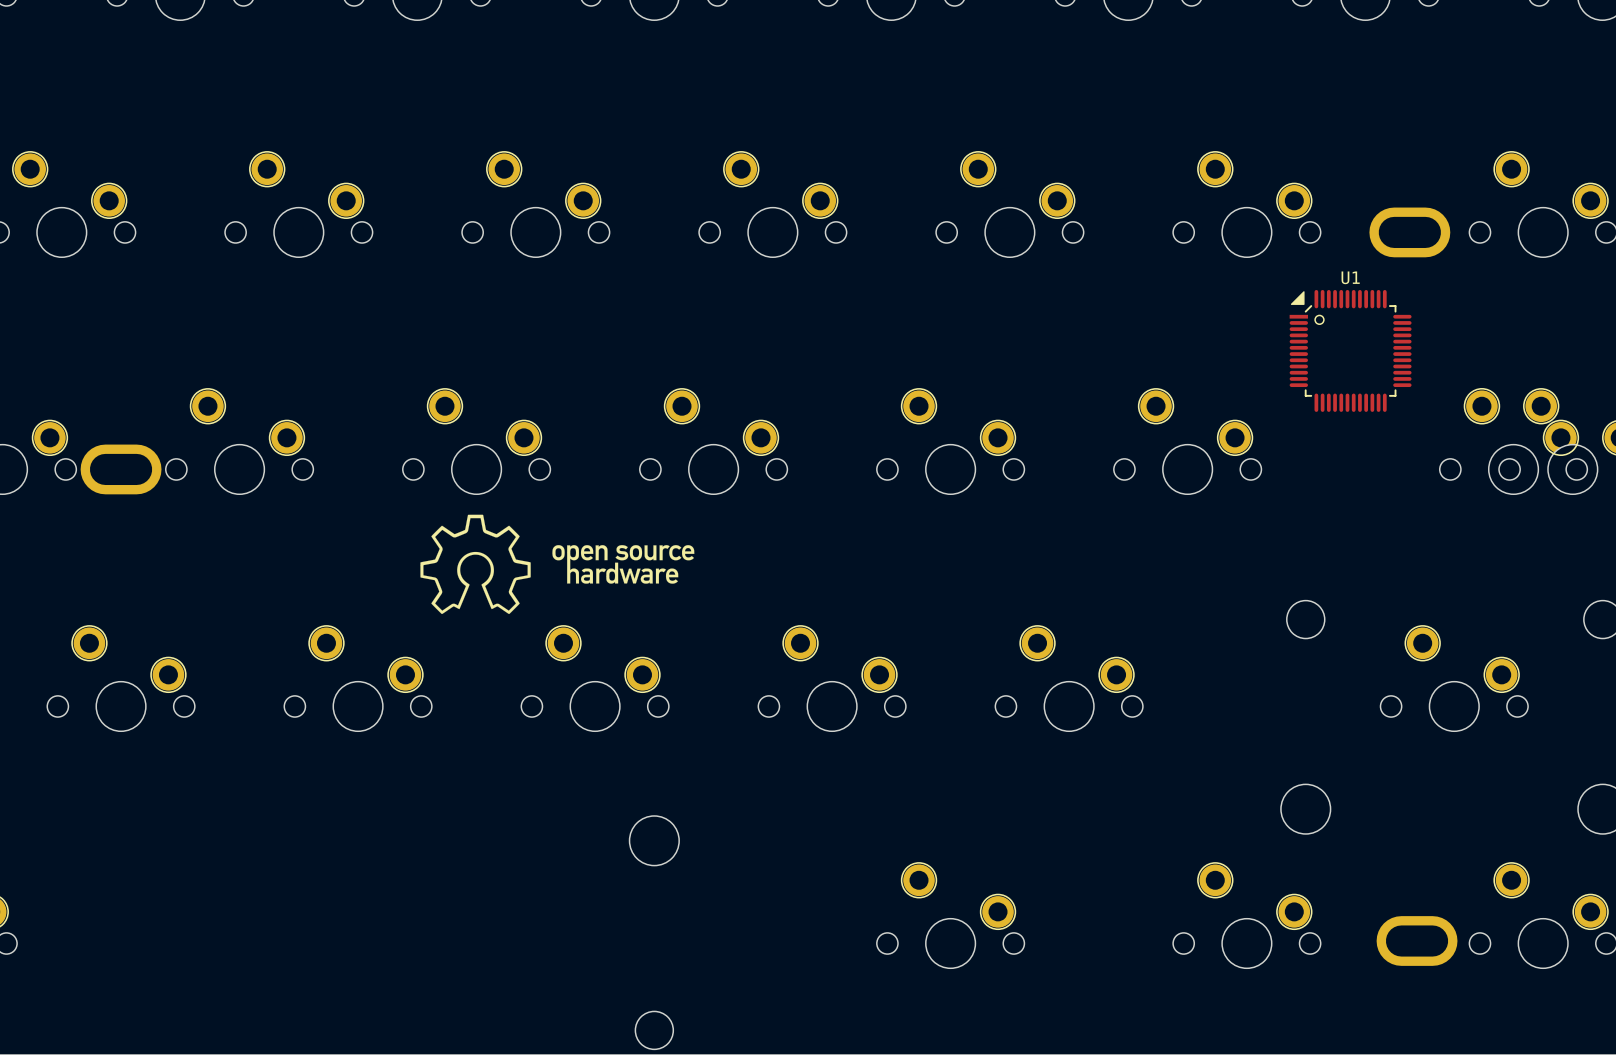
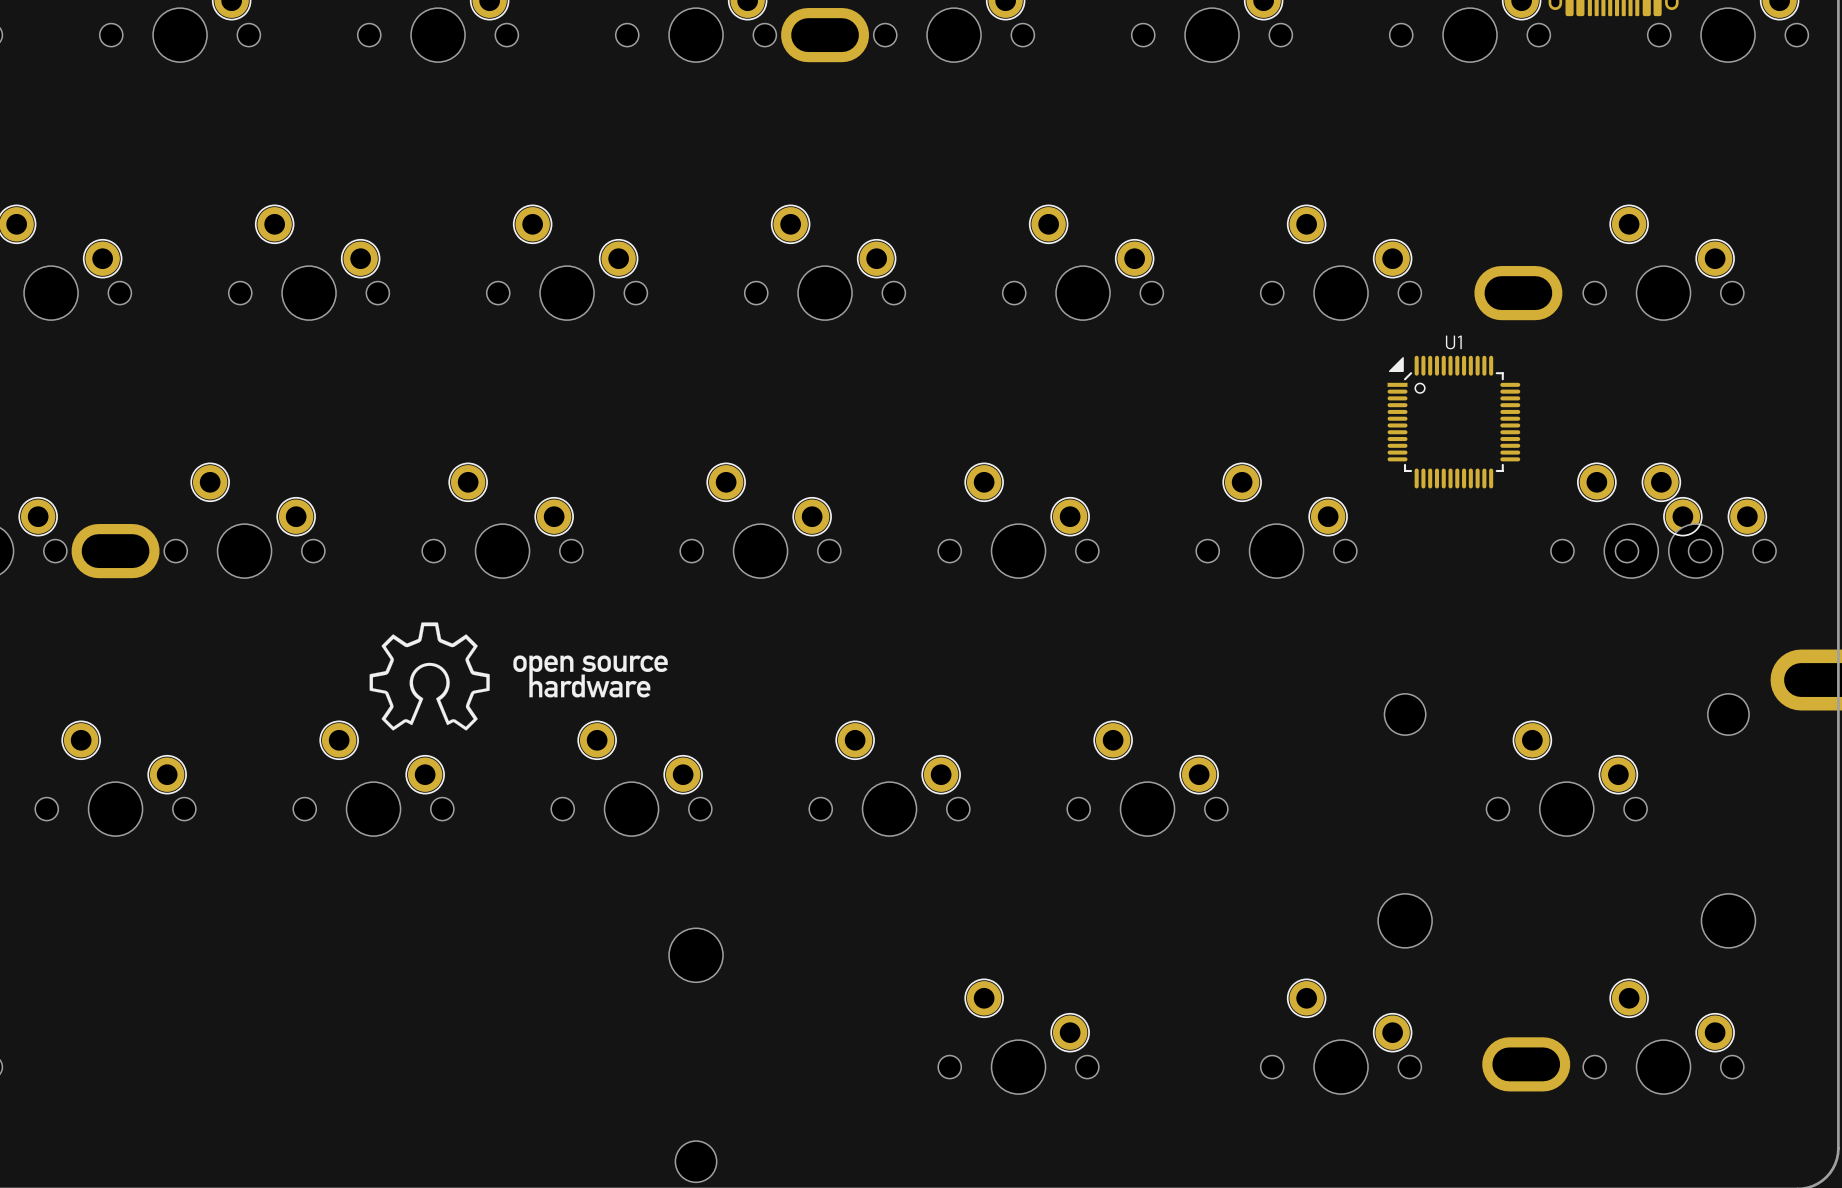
drawing position: (557, 564) -> (518, 676)

